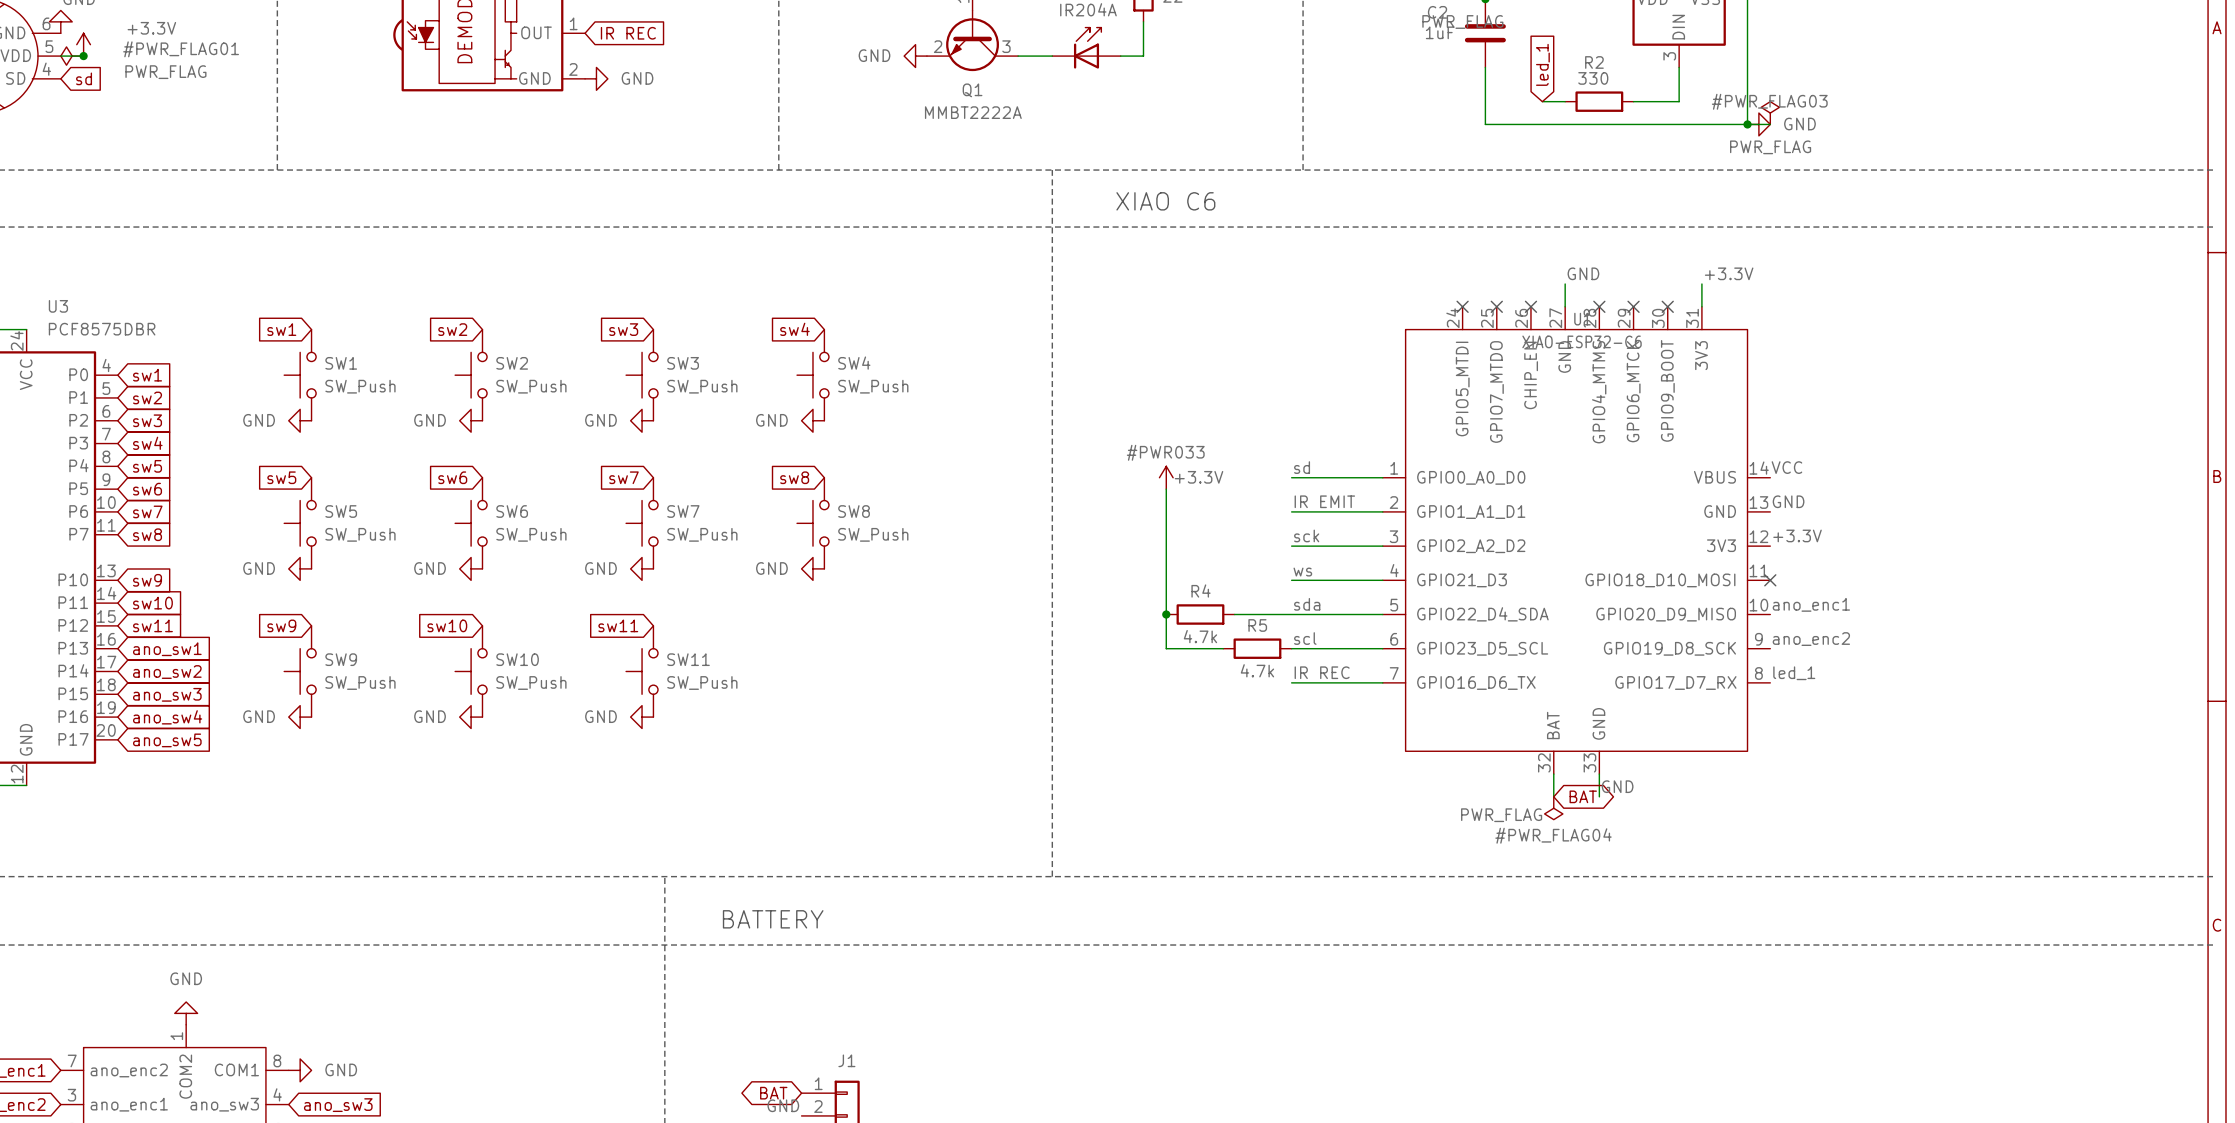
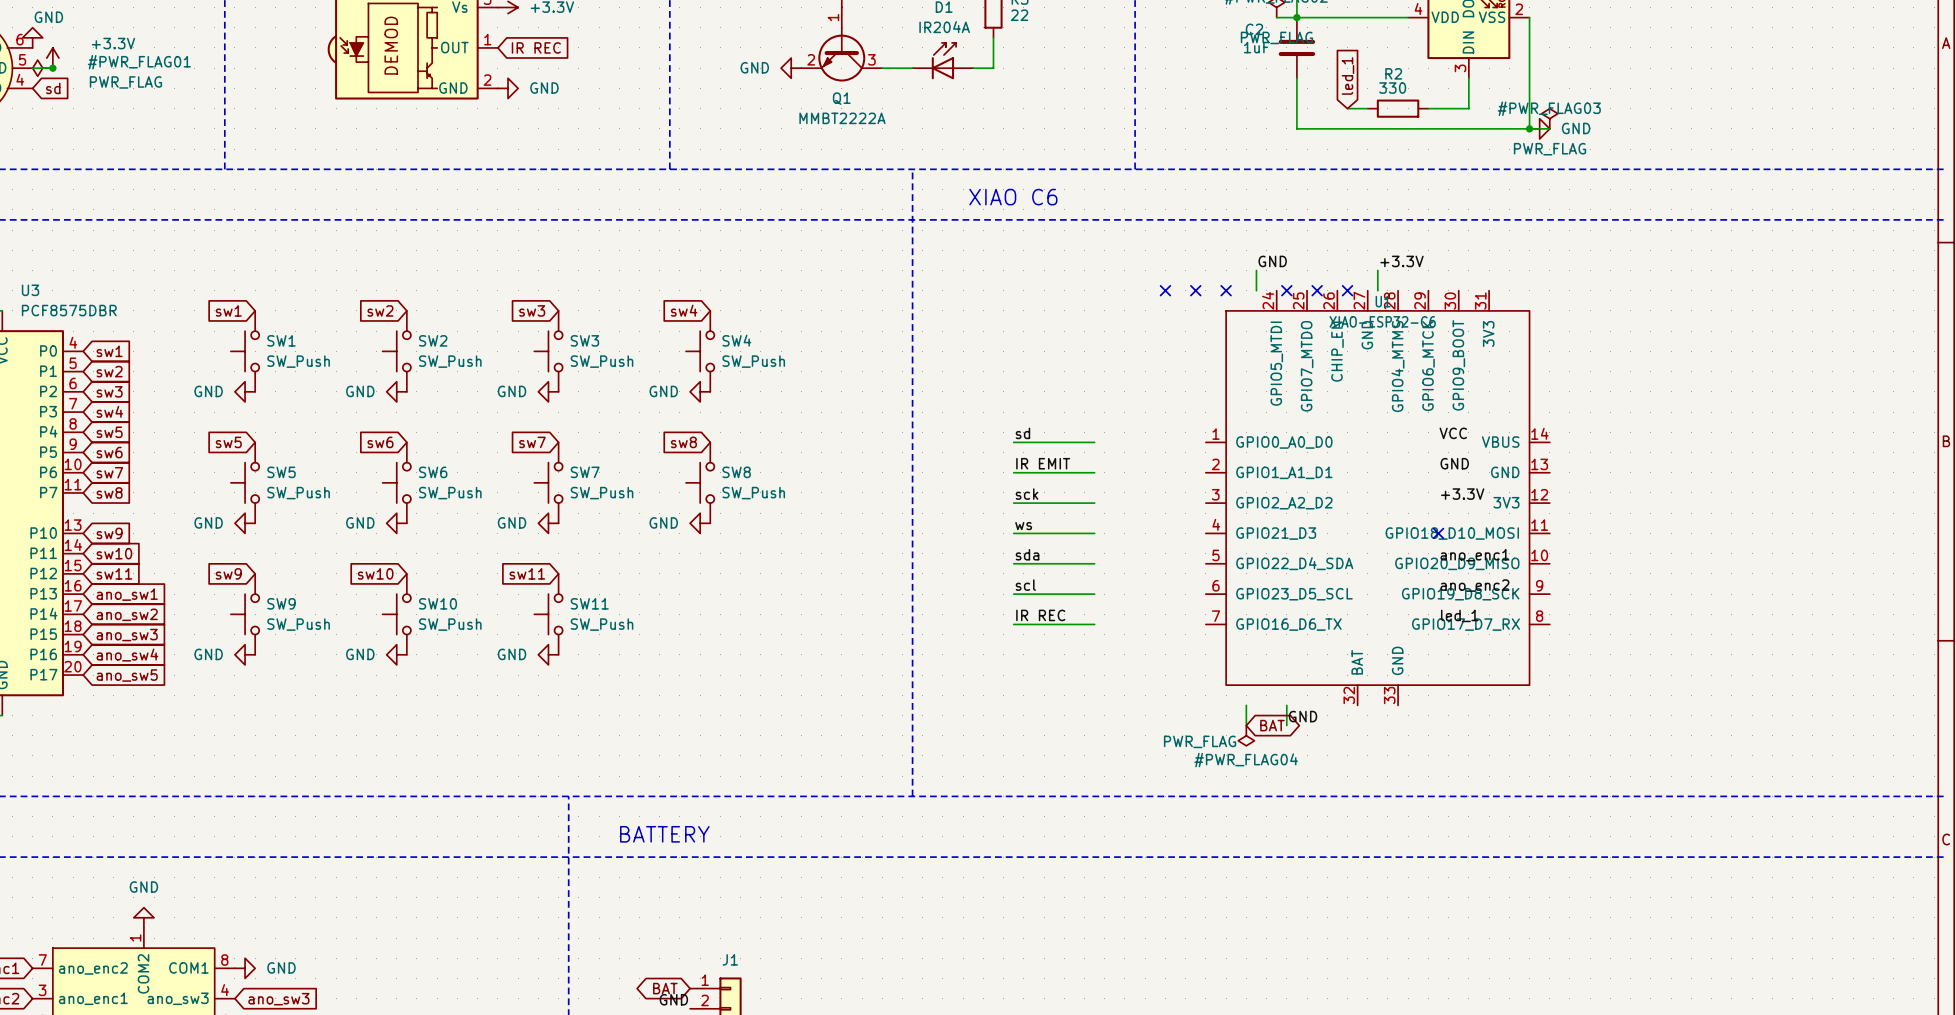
label: none -> GND (1272, 261)
label: GND (1583, 273) -> none
label position: +3.3V (1729, 273) -> +3.3V (1401, 261)
wire: (1565, 284) (1565, 306) -> (1256, 270) (1256, 290)
wire: (1701, 284) (1701, 306) -> (1377, 270) (1377, 290)
no-connect mark: none -> (1165, 290)
no-connect mark: none -> (1195, 290)
no-connect mark: none -> (1226, 290)
no-connect mark: (1462, 306) -> none
no-connect mark: none -> (1286, 290)
no-connect mark: (1496, 306) -> none
no-connect mark: none -> (1317, 290)
no-connect mark: (1530, 306) -> none
no-connect mark: none -> (1347, 290)
no-connect mark: (1599, 306) -> none
no-connect mark: (1633, 306) -> none
no-connect mark: (1667, 306) -> none
label position: sd (1302, 467) -> sd (1022, 433)
label position: VCC (1786, 467) -> VCC (1453, 433)
#PWR033: +3.3V (1166, 477) -> none
wire: (1291, 477) (1382, 477) -> (1013, 442) (1094, 442)
wire: (1166, 489) (1166, 648) -> none
label position: IR EMIT (1324, 501) -> IR EMIT (1043, 463)
label: none -> GND (1454, 463)
label: GND (1788, 501) -> none
wire: (1291, 511) (1382, 511) -> (1013, 472) (1094, 472)
label position: sck (1306, 535) -> sck (1027, 494)
label position: +3.3V (1797, 535) -> +3.3V (1462, 494)
wire: (1291, 546) (1382, 546) -> (1013, 503) (1094, 503)
label position: ws (1302, 572) -> ws (1023, 526)
wire: (1291, 580) (1382, 580) -> (1013, 533) (1094, 533)
no-connect mark: none -> (1438, 533)
no-connect mark: (1770, 580) -> none
label position: sda (1307, 604) -> sda (1027, 554)
label position: ano_enc1 (1811, 604) -> ano_enc1 (1474, 555)
wire: none -> (1013, 563) (1074, 563)
junction: (1166, 614) -> none
R4: 4.7k (1200, 614) -> none
wire: (1257, 614) (1382, 614) -> none
label position: scl (1305, 638) -> scl (1025, 585)
label position: ano_enc2 (1811, 639) -> ano_enc2 (1474, 585)
wire: none -> (1064, 594) (1094, 594)
R5: 4.7k (1257, 648) -> none
wire: (1291, 648) (1382, 648) -> none
label position: IR REC (1322, 672) -> IR REC (1040, 615)
label position: led_1 (1794, 673) -> led_1 (1459, 615)
wire: (1291, 682) (1382, 682) -> (1013, 624) (1094, 624)
wire: (1553, 774) (1553, 796) -> (1246, 705) (1246, 725)
wire: (1599, 774) (1599, 796) -> (1286, 705) (1286, 725)
label position: GND (1617, 786) -> GND (1303, 716)
global label position: BAT (1583, 796) -> BAT (1272, 725)
#PWR_FLAG04 position: PWR_FLAG (1553, 808) -> PWR_FLAG (1246, 735)

